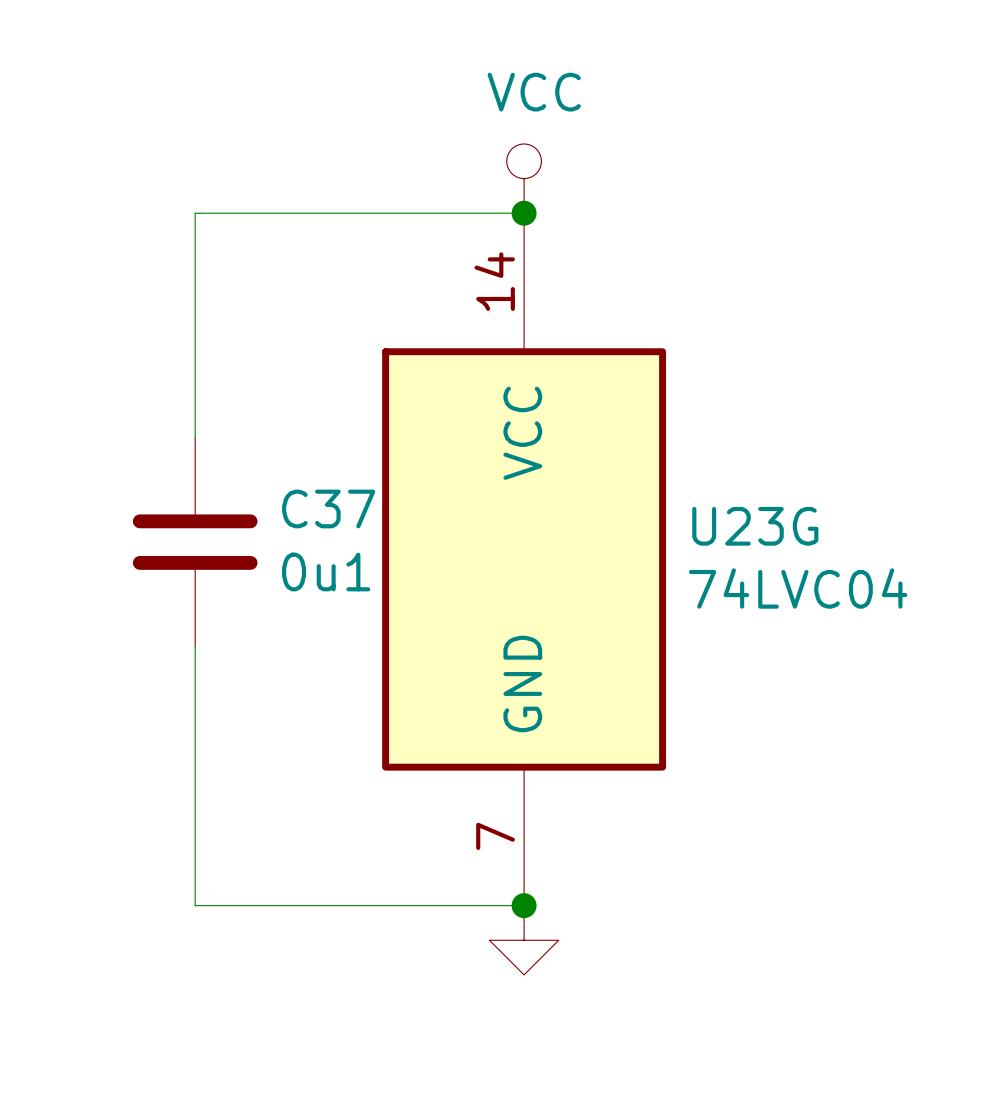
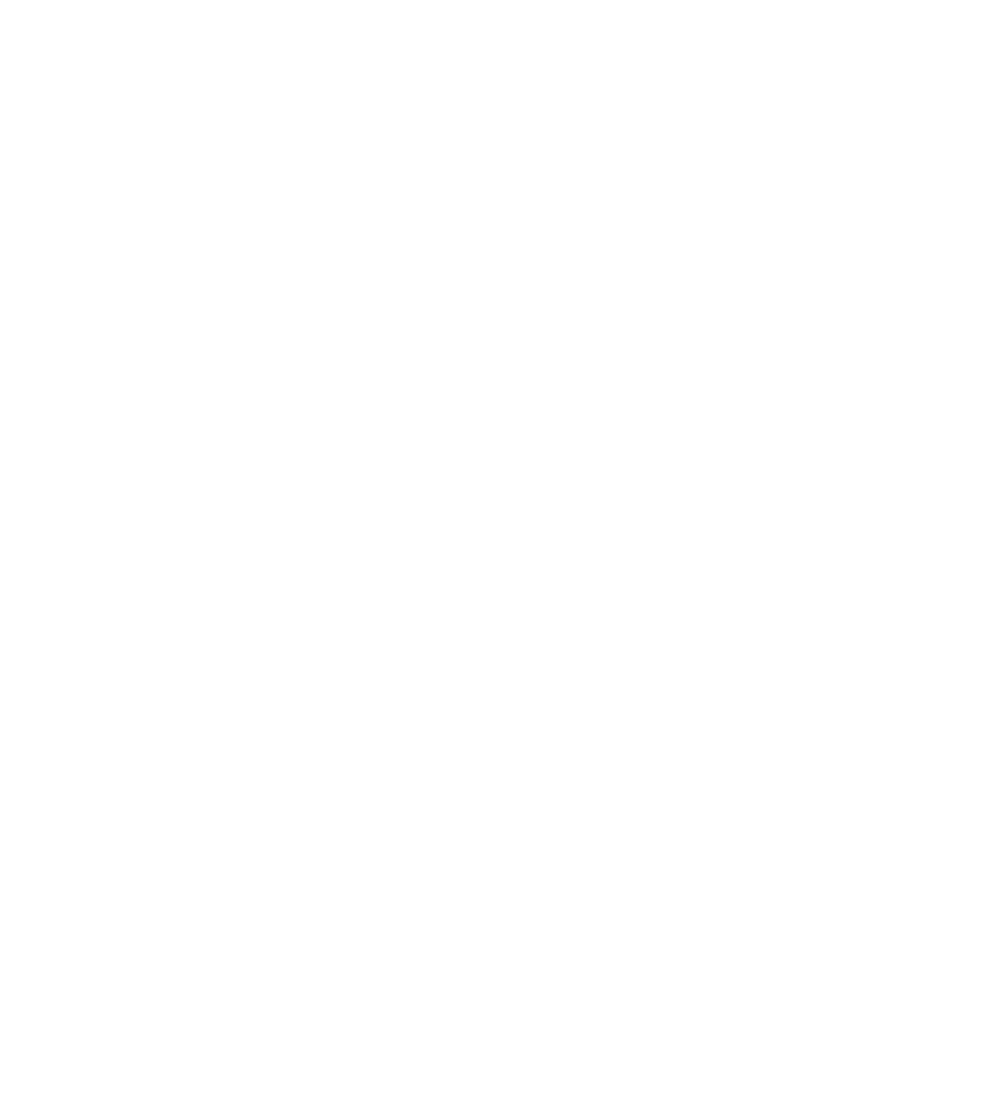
power symbol: VCC (524, 178) -> none
wire: (524, 213) (195, 213) (195, 438) -> none
junction: (524, 213) -> none
C37: 0u1 (195, 542) -> none
U23G: 74LVC04 (524, 559) -> none
wire: (195, 645) (195, 905) (524, 905) -> none
junction: (524, 905) -> none
power symbol: (524, 940) -> none

